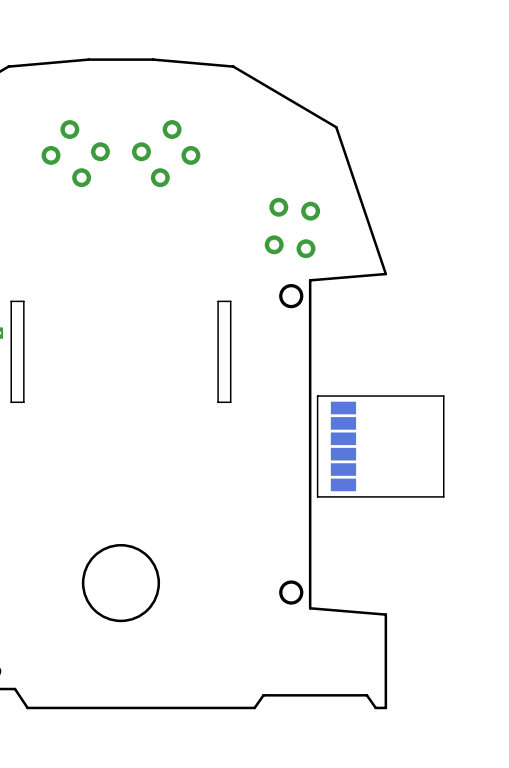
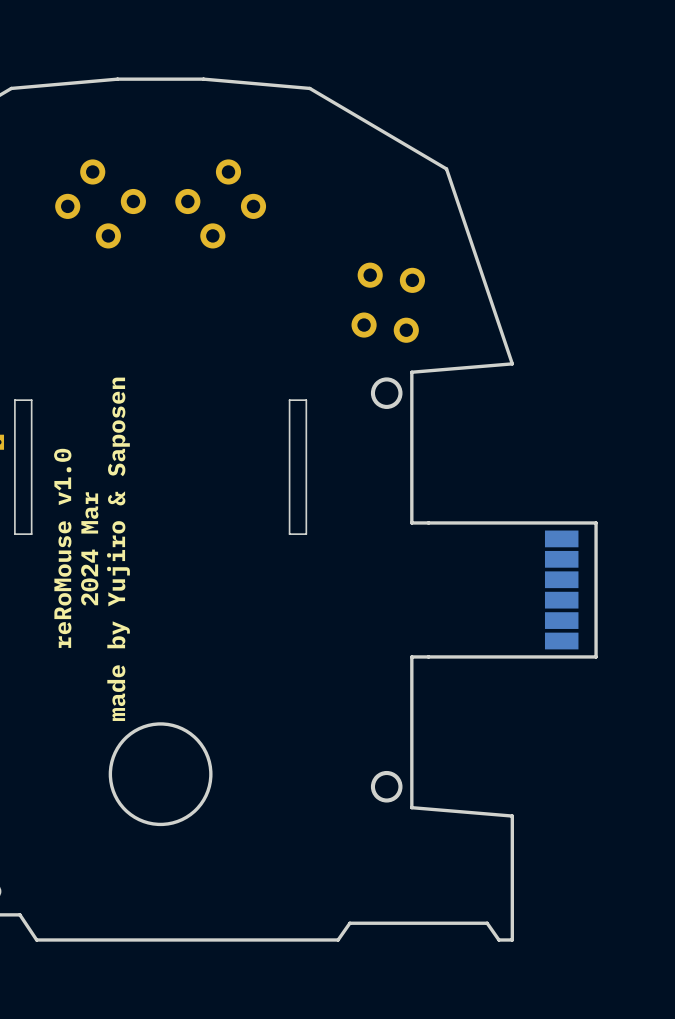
board edge: (310, 393) (310, 494) -> (411, 522) (596, 522) (596, 656) (411, 656)
board edge: (443, 396) (317, 396) (317, 496) (443, 496) (443, 396) -> none
text: none -> reRoMouse v1.0 (62, 548)
text: none -> 2024 Mar (89, 548)
text: none -> made by Yujiro & Saposen (118, 549)
part position: (343, 446) -> (561, 589)

